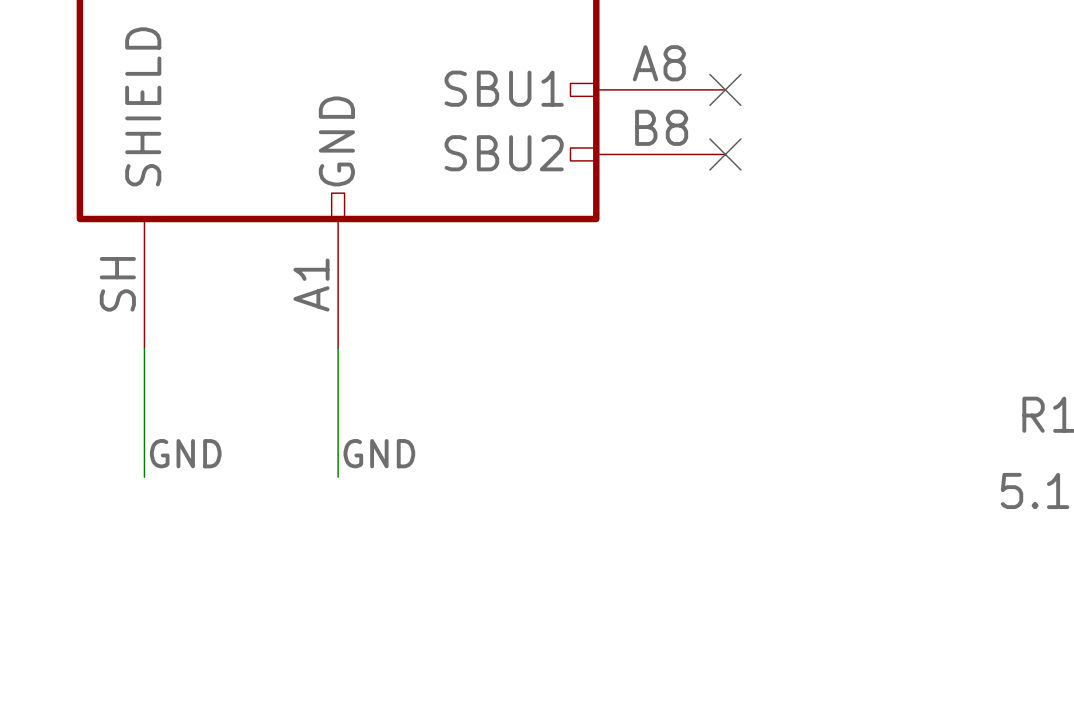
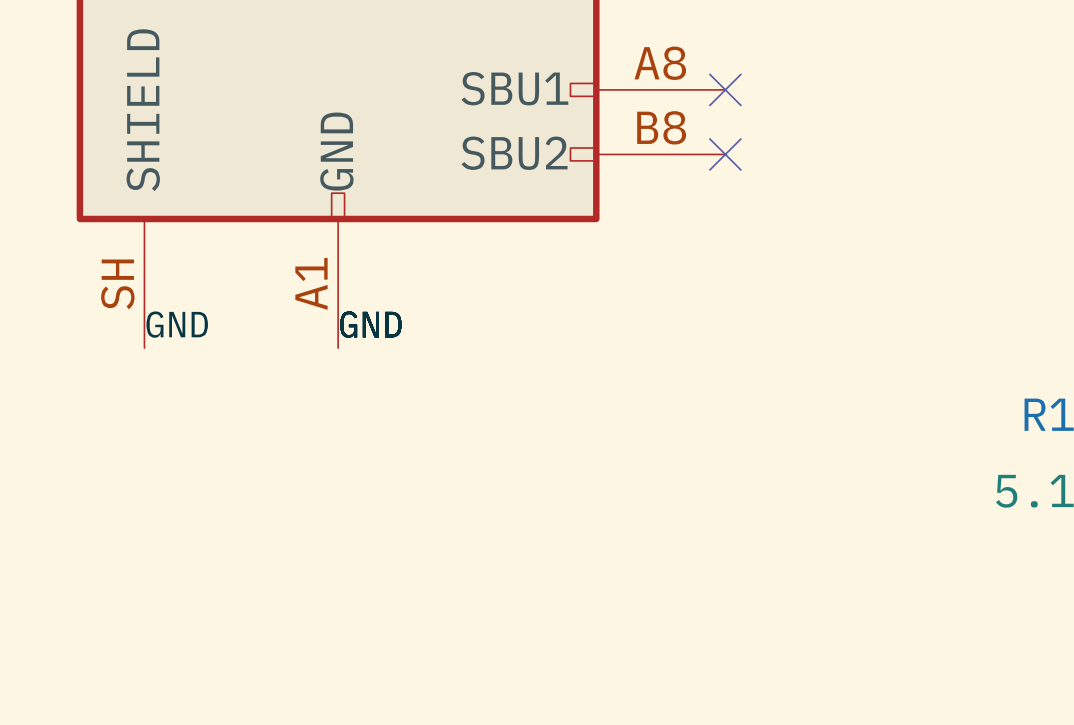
label: none -> GND (177, 324)
label: none -> GND (370, 324)
wire: (144, 348) (144, 477) -> none
wire: (338, 348) (338, 477) -> none
label: GND (185, 453) -> none
label: GND (379, 453) -> none

